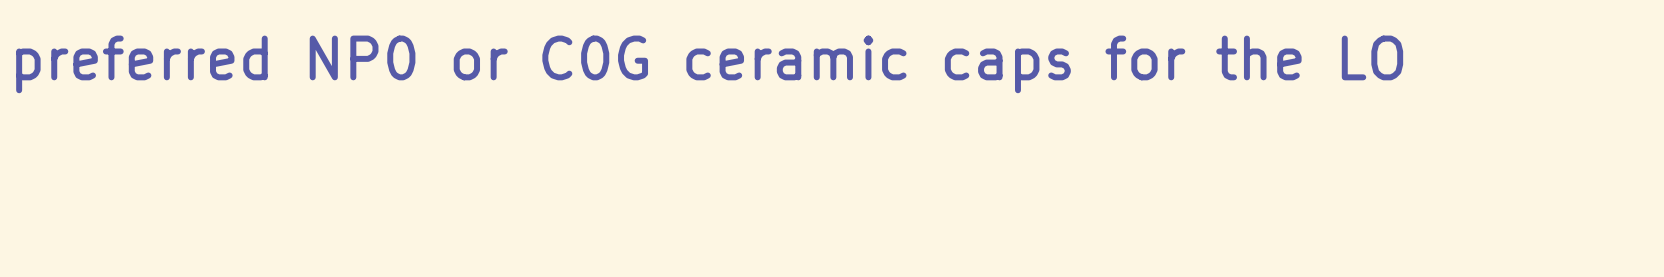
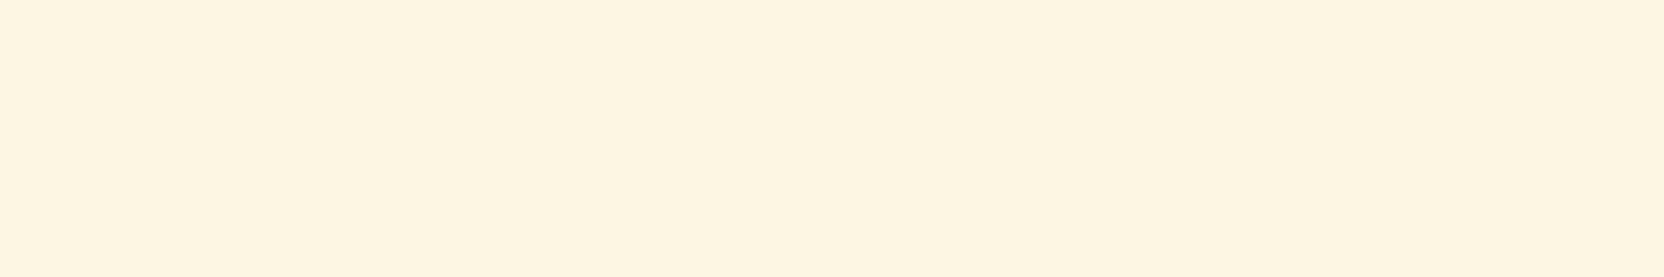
text: preferred NP0 or C0G ceramic caps for the LO (709, 64) -> none

